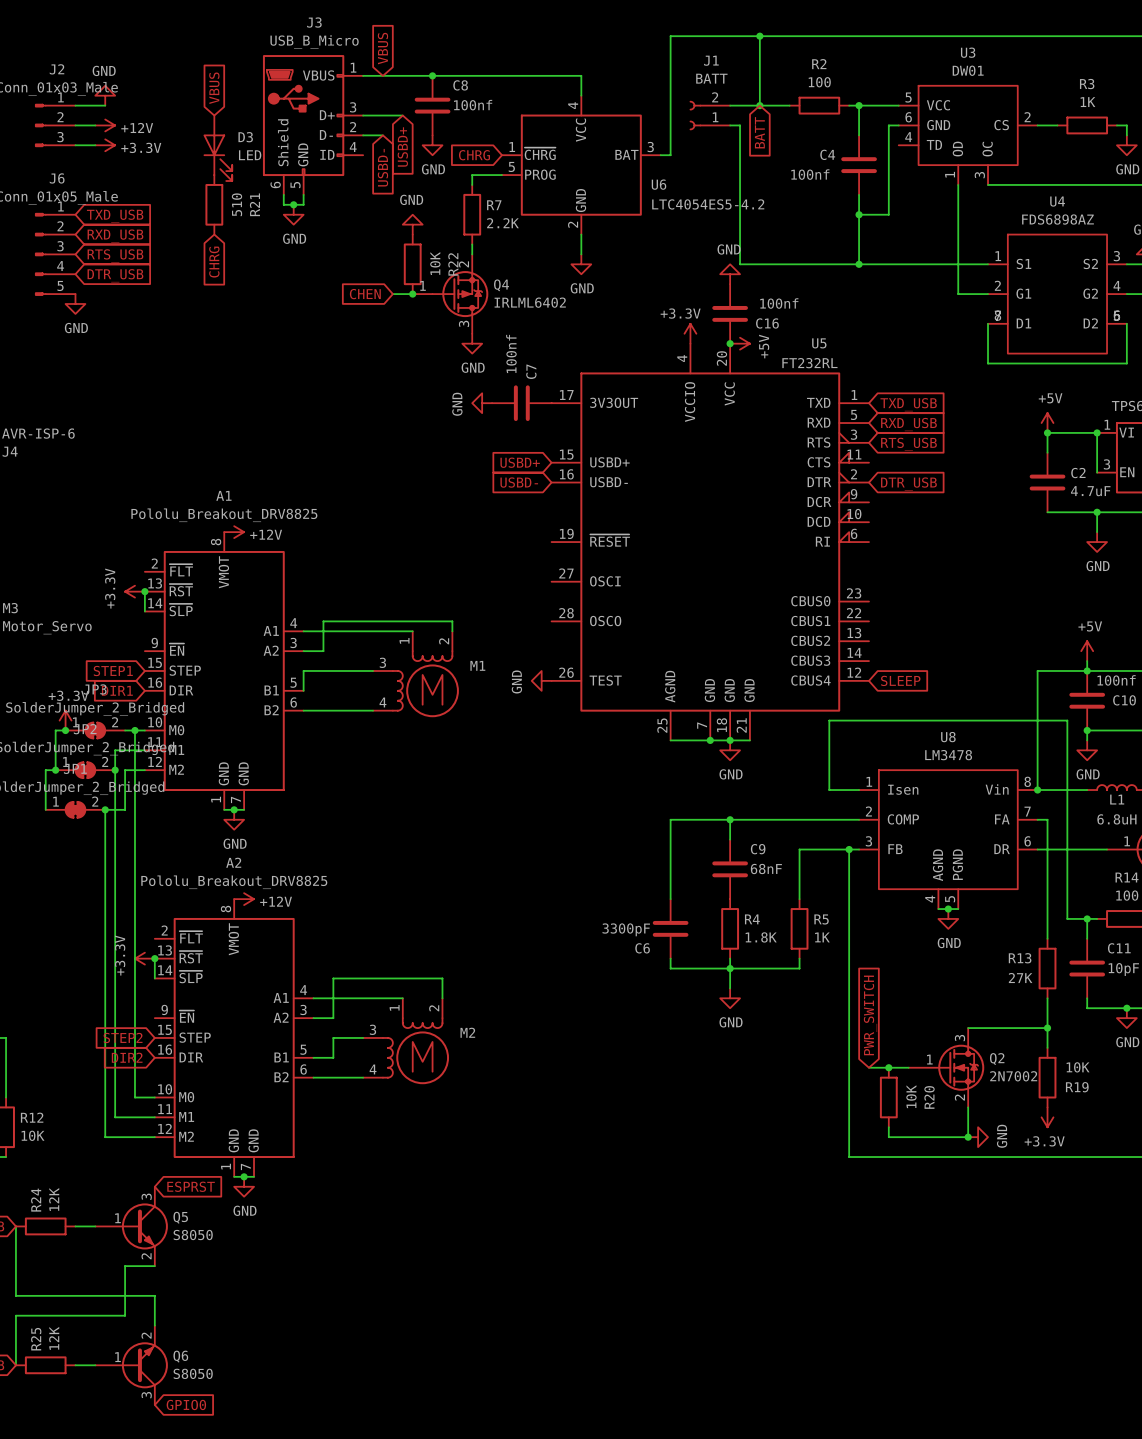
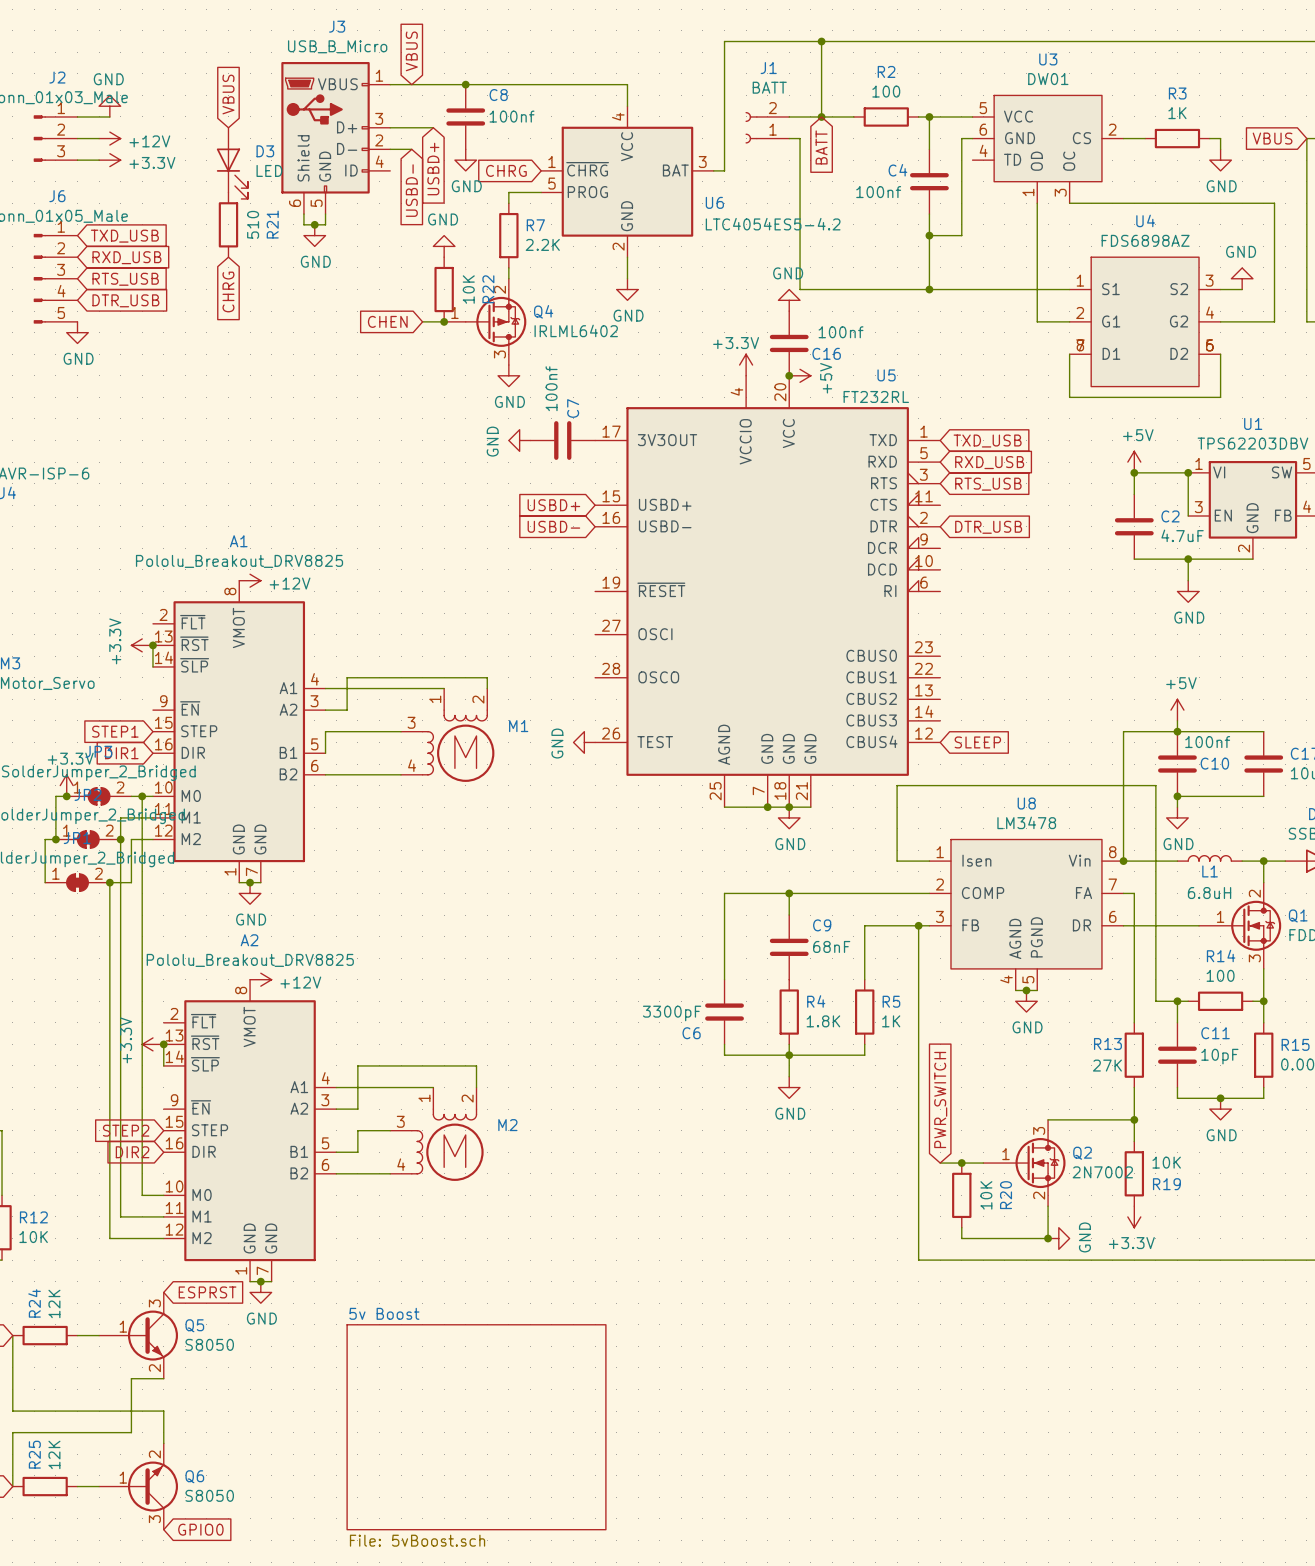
sheet 5v Boost: none -> File: 5vBoost.sch (476, 1427)

